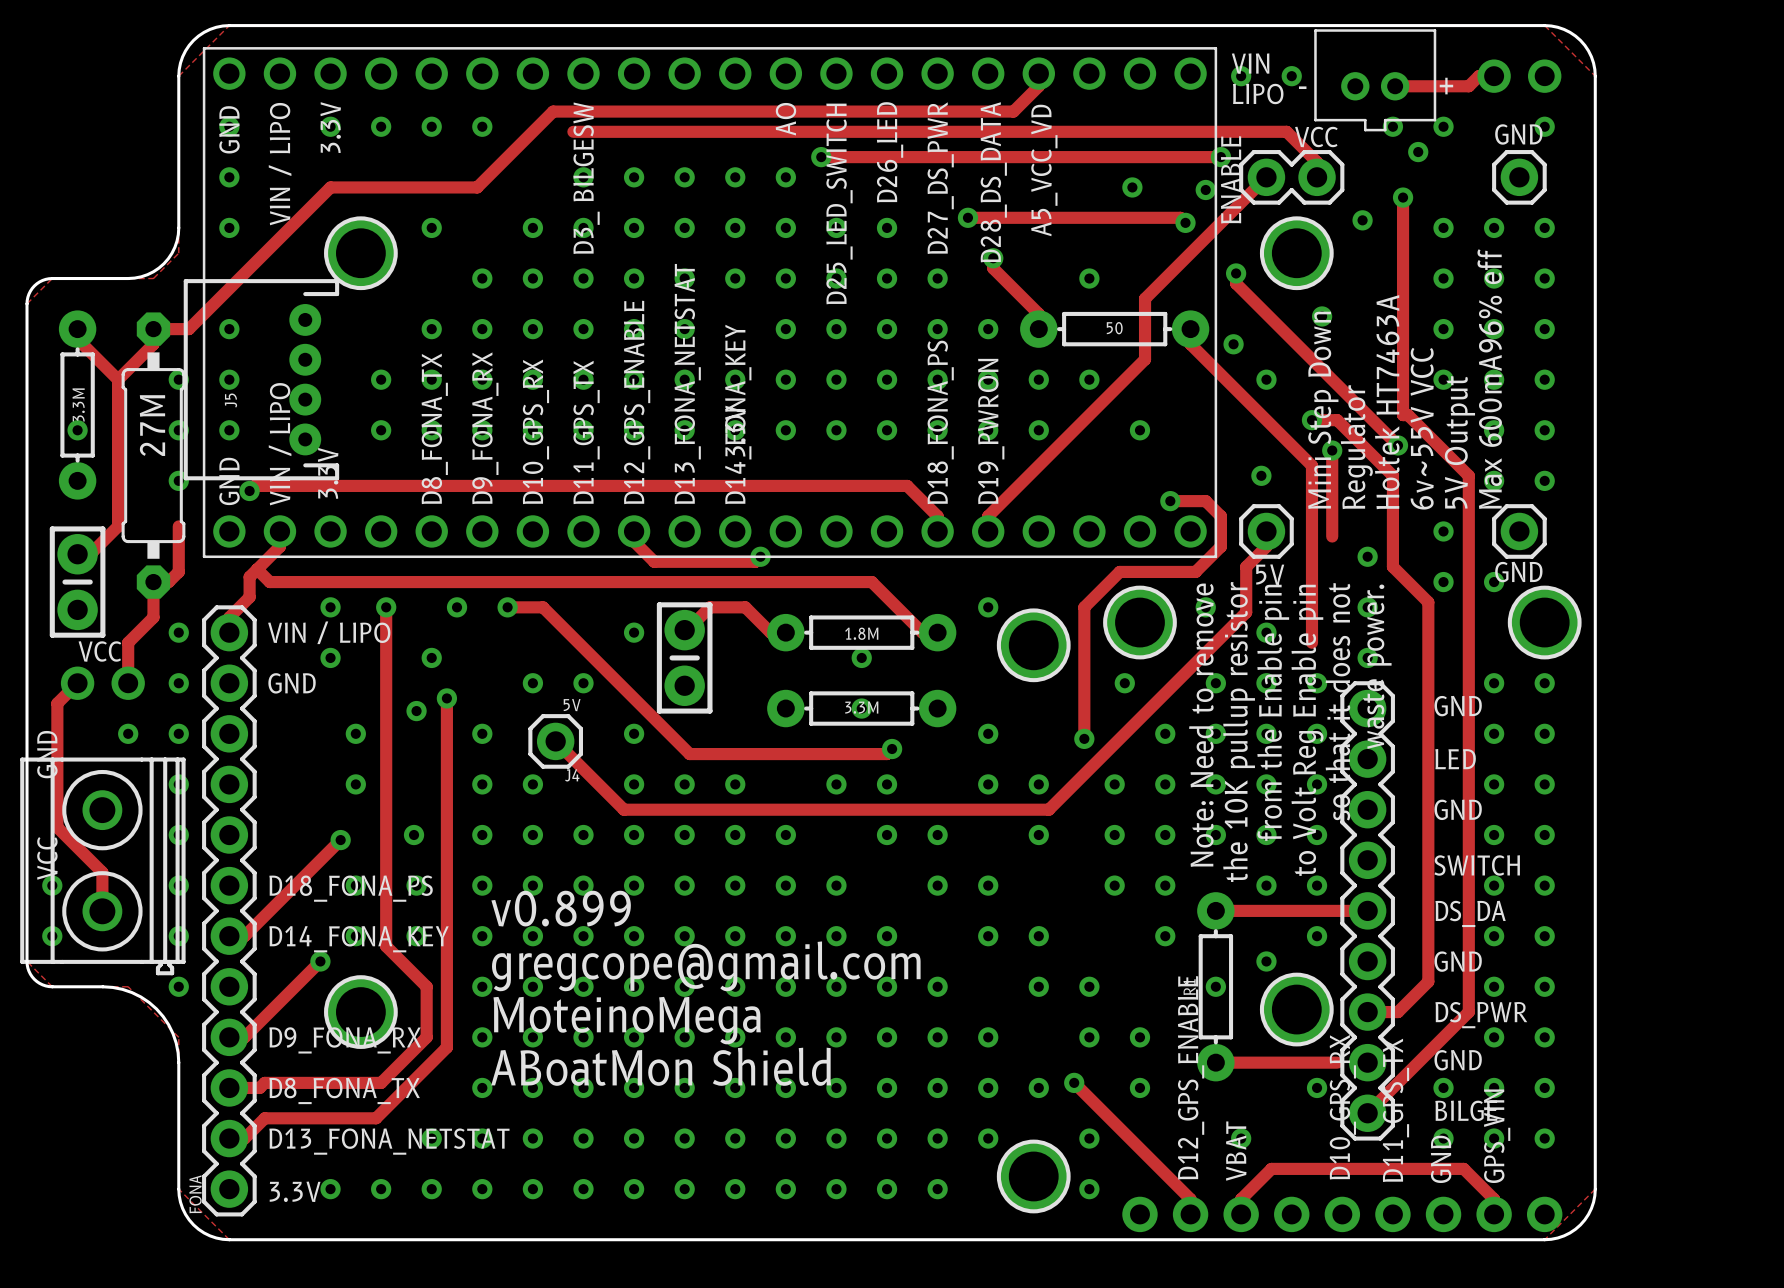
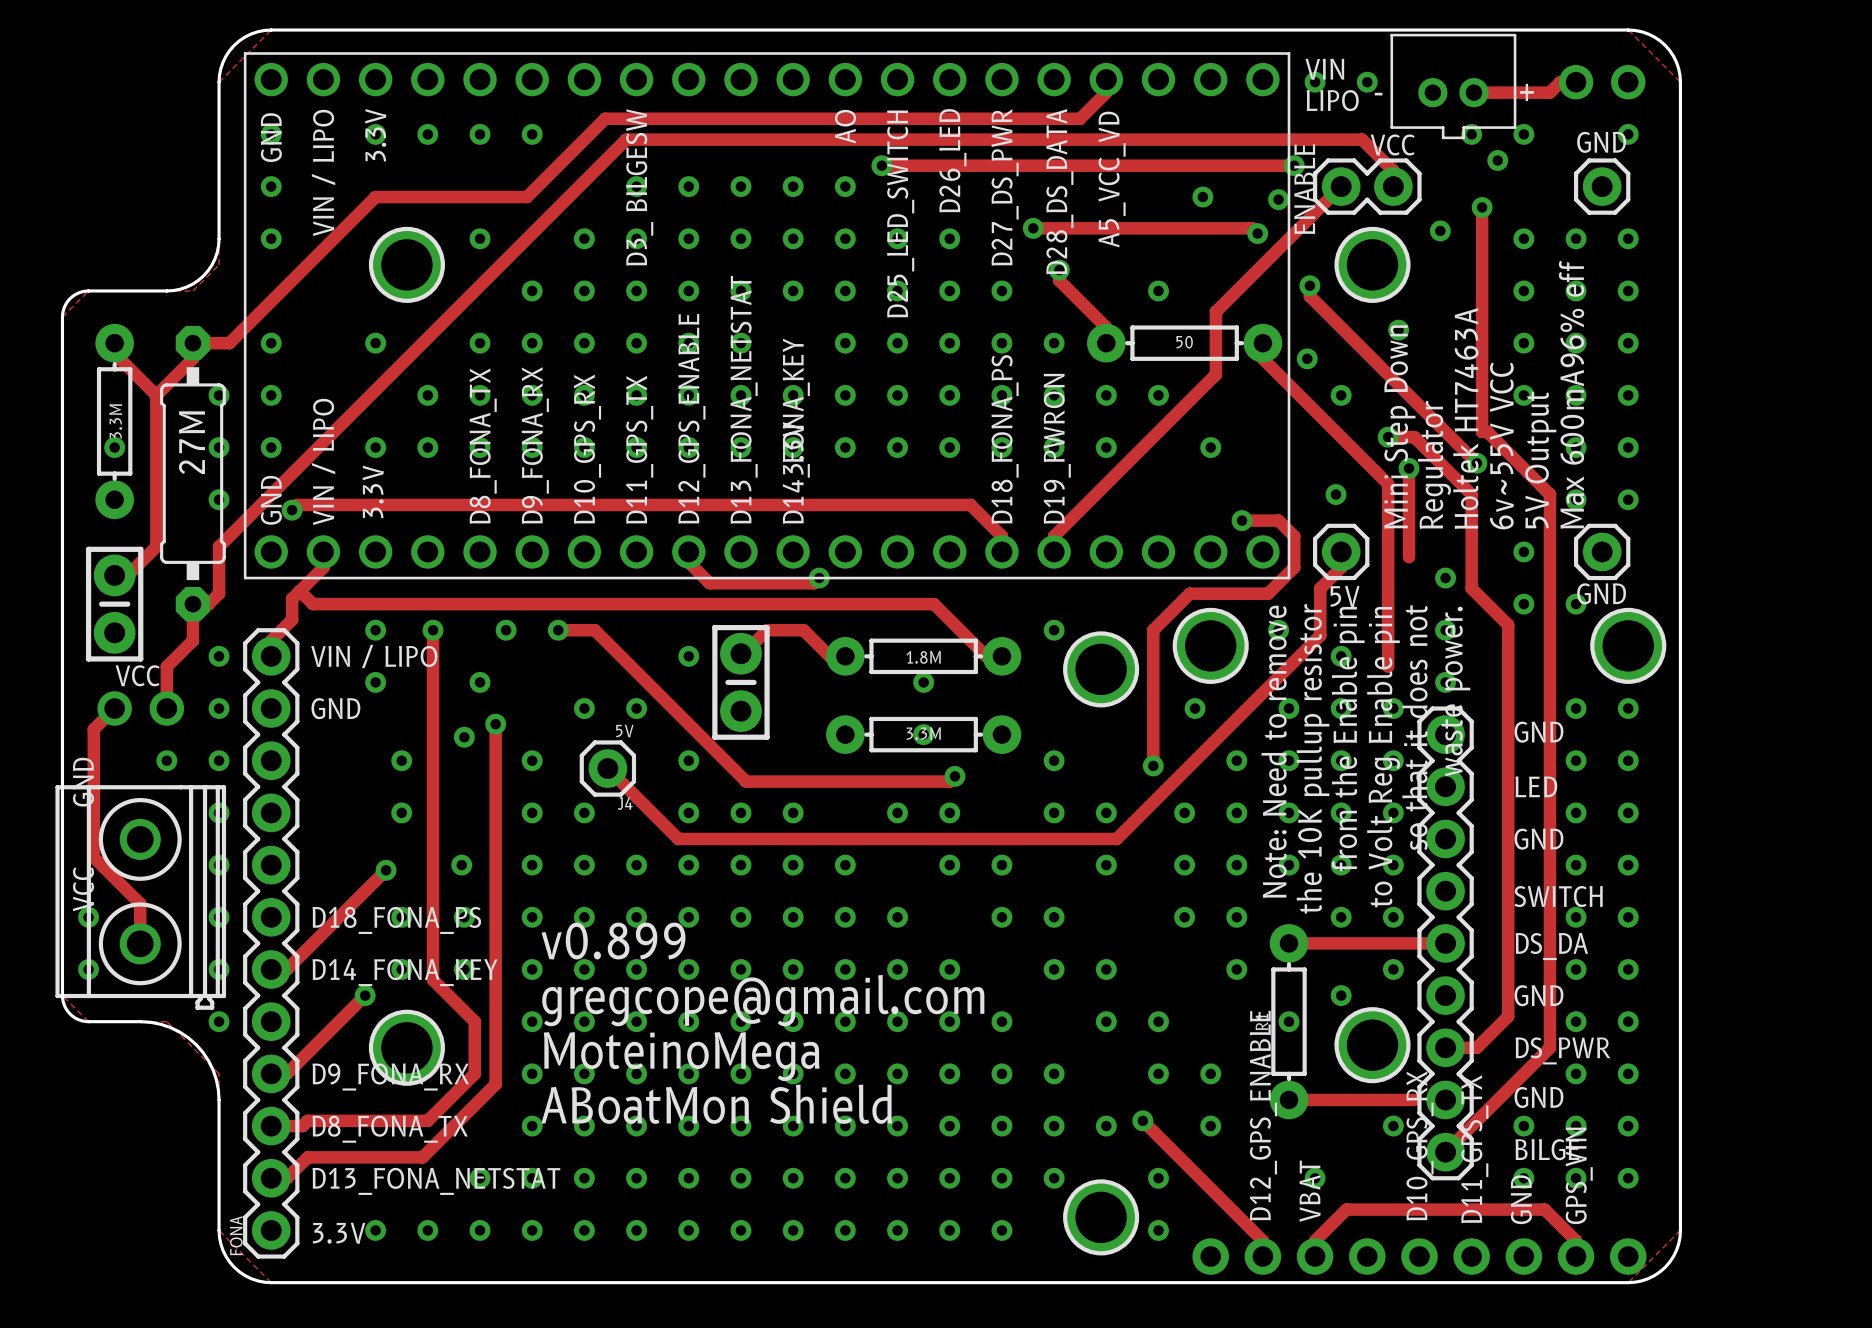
track: none -> (626, 139) (219, 546)
via: none -> (375, 343)
J5: (261, 379) -> none
via: none -> (375, 447)

